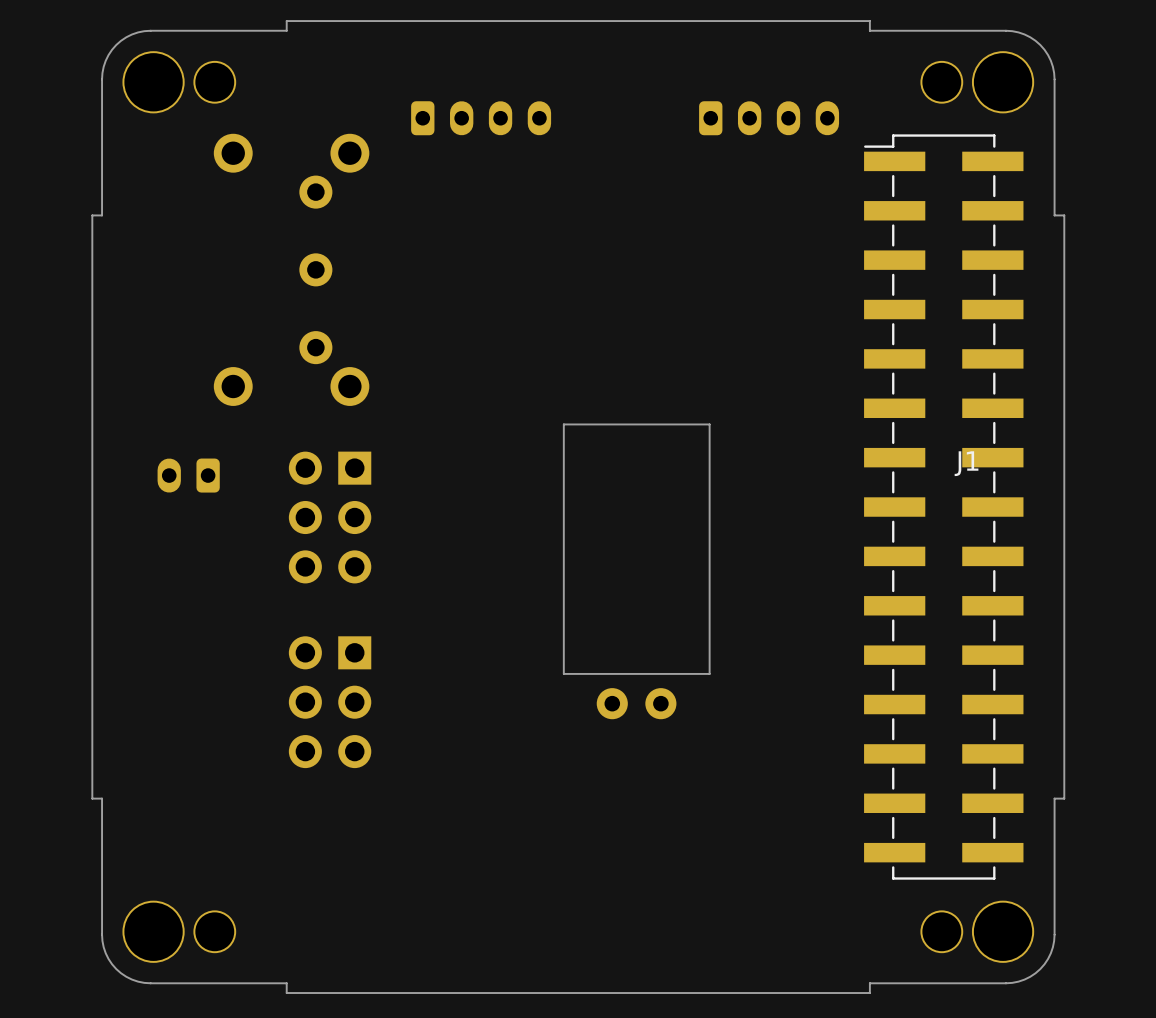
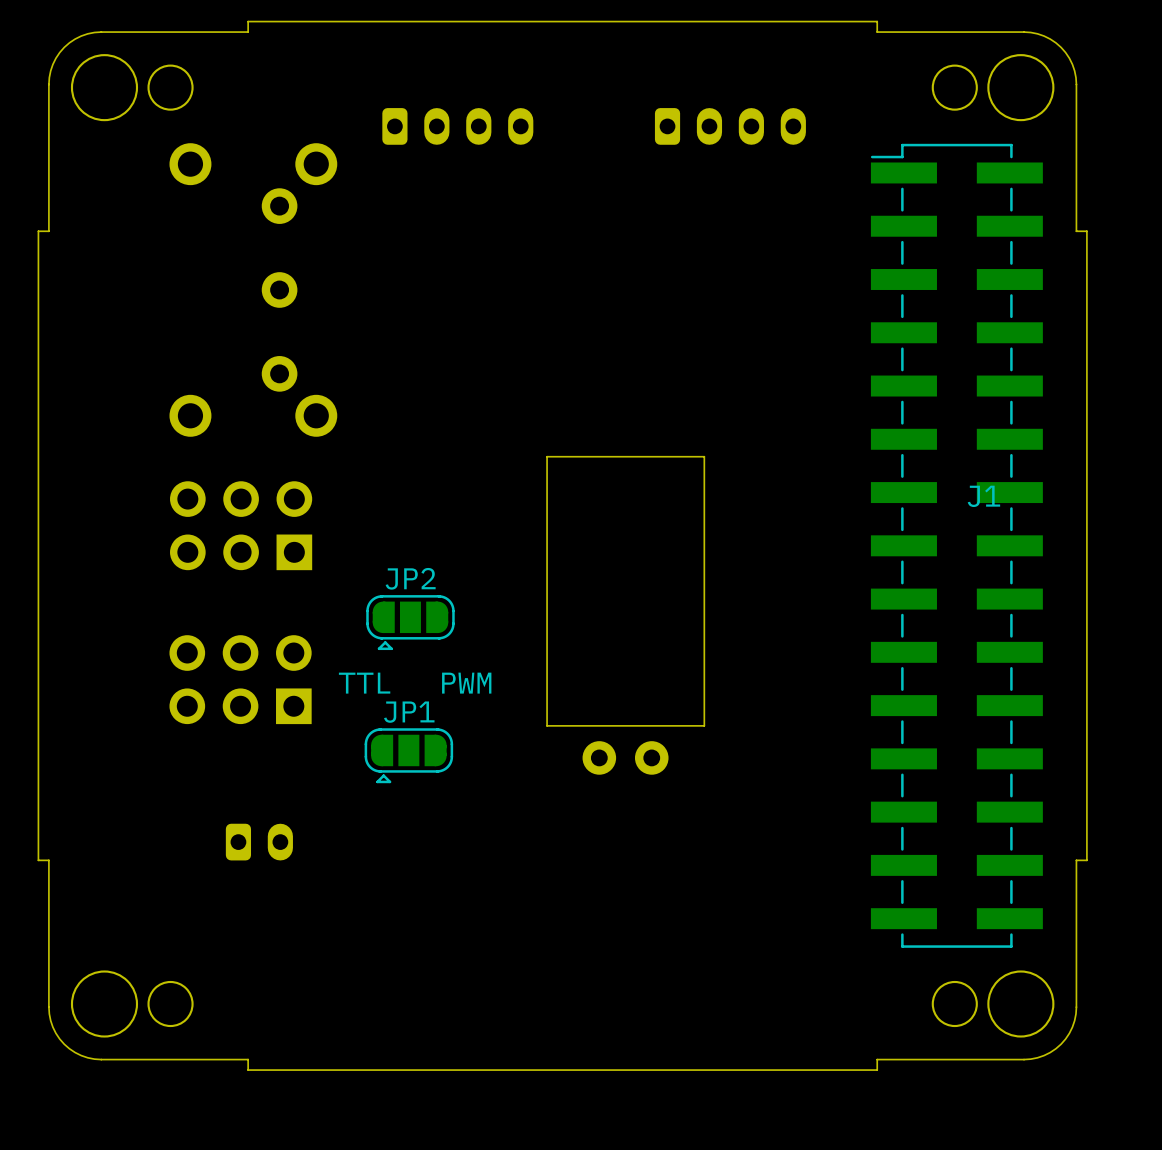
part position: (769, 118) -> (730, 126)
part rotation: 0° (188, 475) -> 180° (259, 842)
part position: (188, 475) -> (259, 842)
part rotation: 0° (330, 517) -> 90° clockwise (241, 525)
JP2: none -> (410, 622)
part: none -> (240, 679)
text: none -> TTL (364, 683)
text: none -> PWM (466, 683)
JP1: none -> (408, 755)
part: (330, 702) -> none

